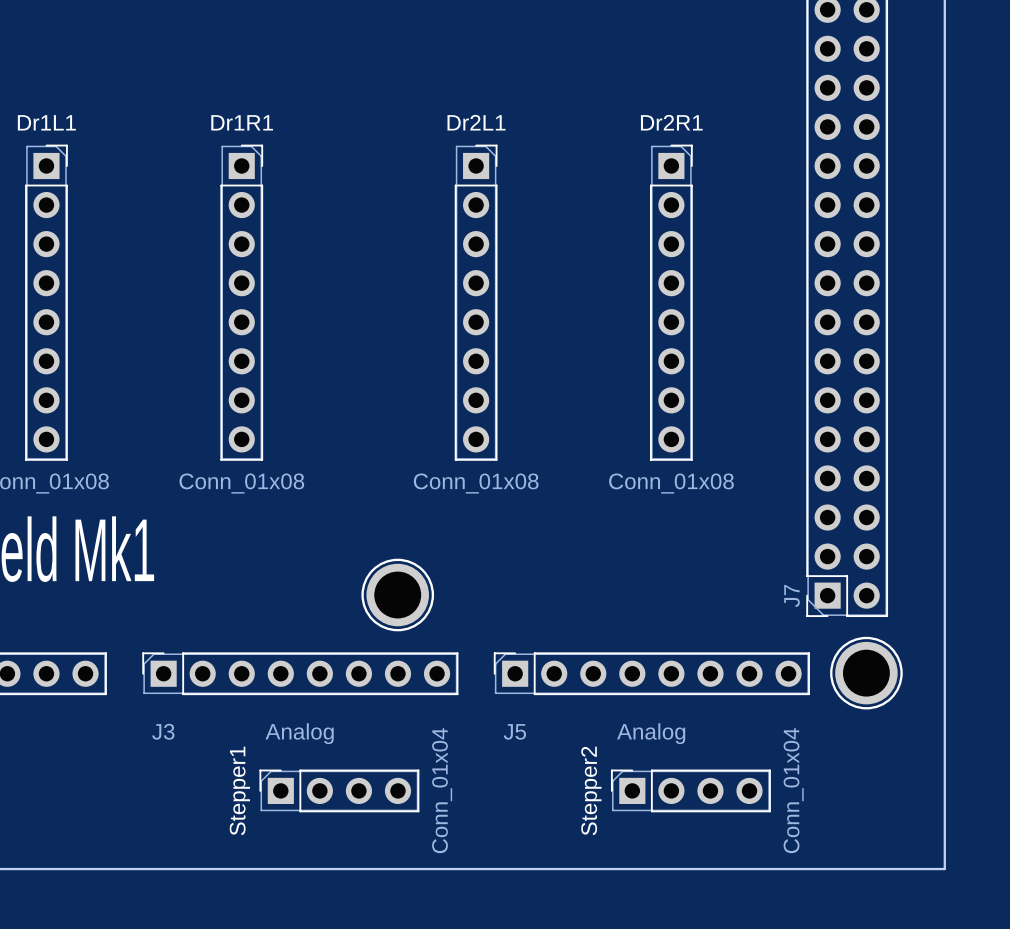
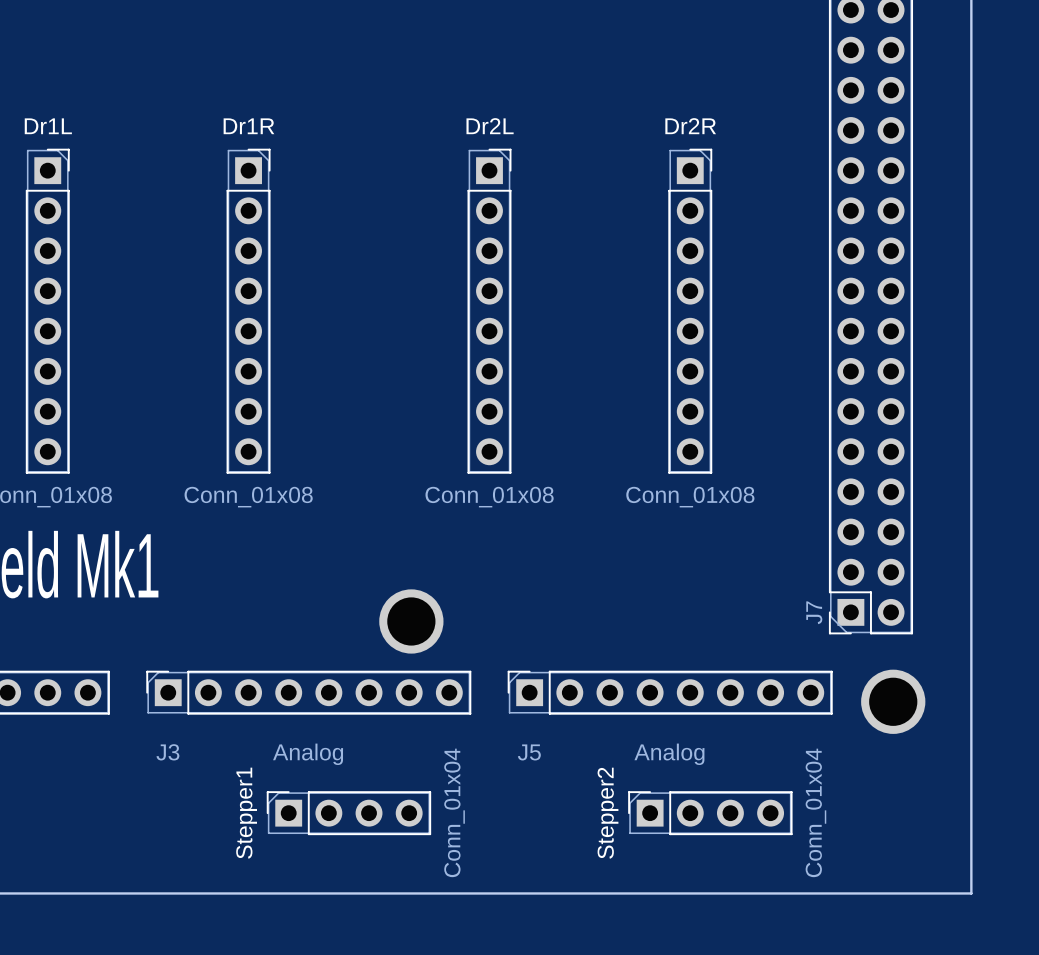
Dr1L1 name: Dr1L1 (46, 122) -> Dr1L (48, 126)
Dr1R1 name: Dr1R1 (242, 122) -> Dr1R (248, 126)
Dr2L1 name: Dr2L1 (476, 122) -> Dr2L (490, 126)
Dr2R1 name: Dr2R1 (671, 122) -> Dr2R (690, 126)
part footprint: [361, 558, 435, 632] -> [379, 589, 444, 654]
part footprint: [830, 636, 903, 710] -> [861, 669, 926, 734]

